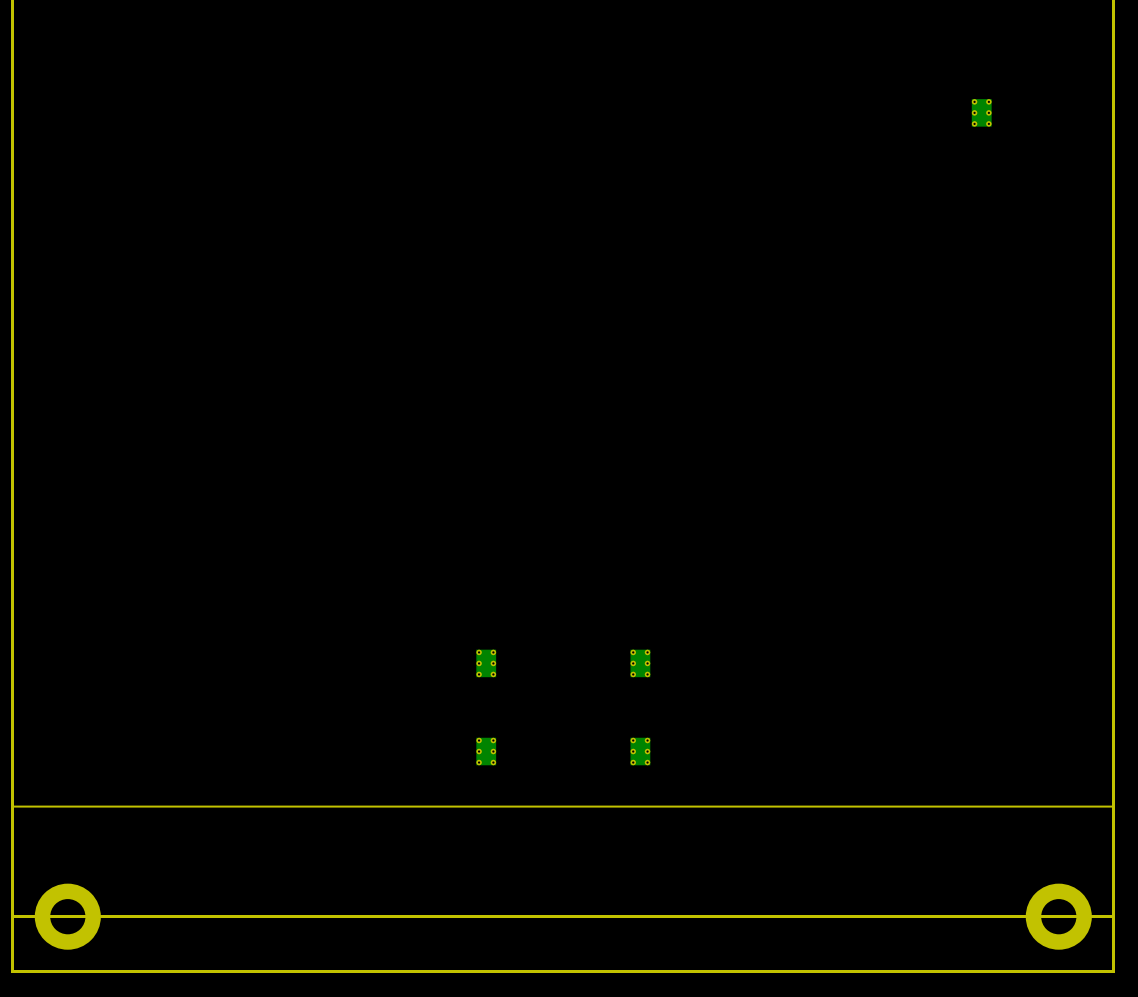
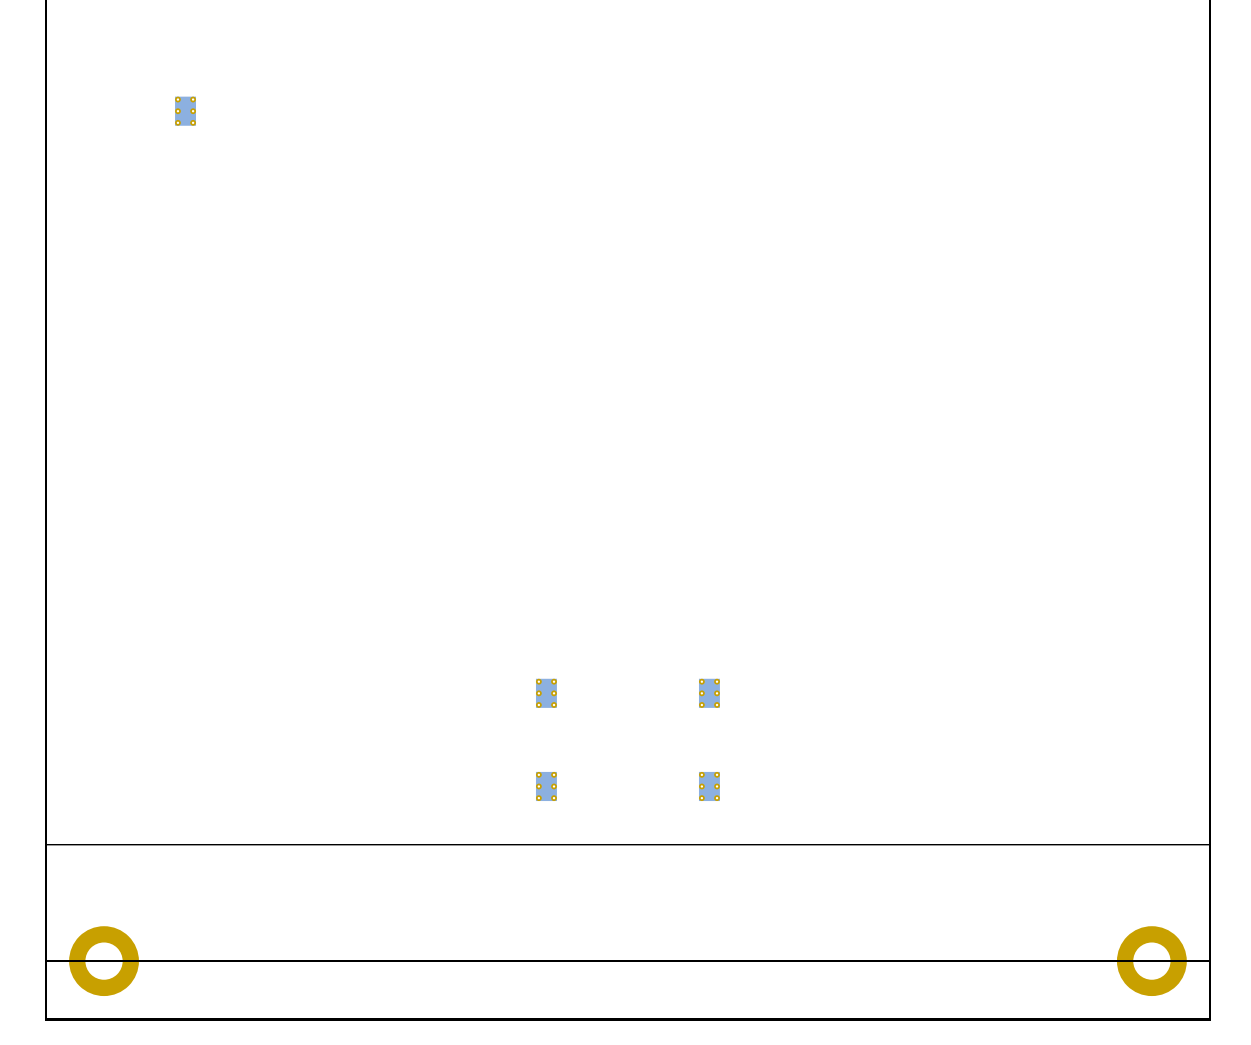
part: none -> (185, 111)
part: (981, 112) -> none

